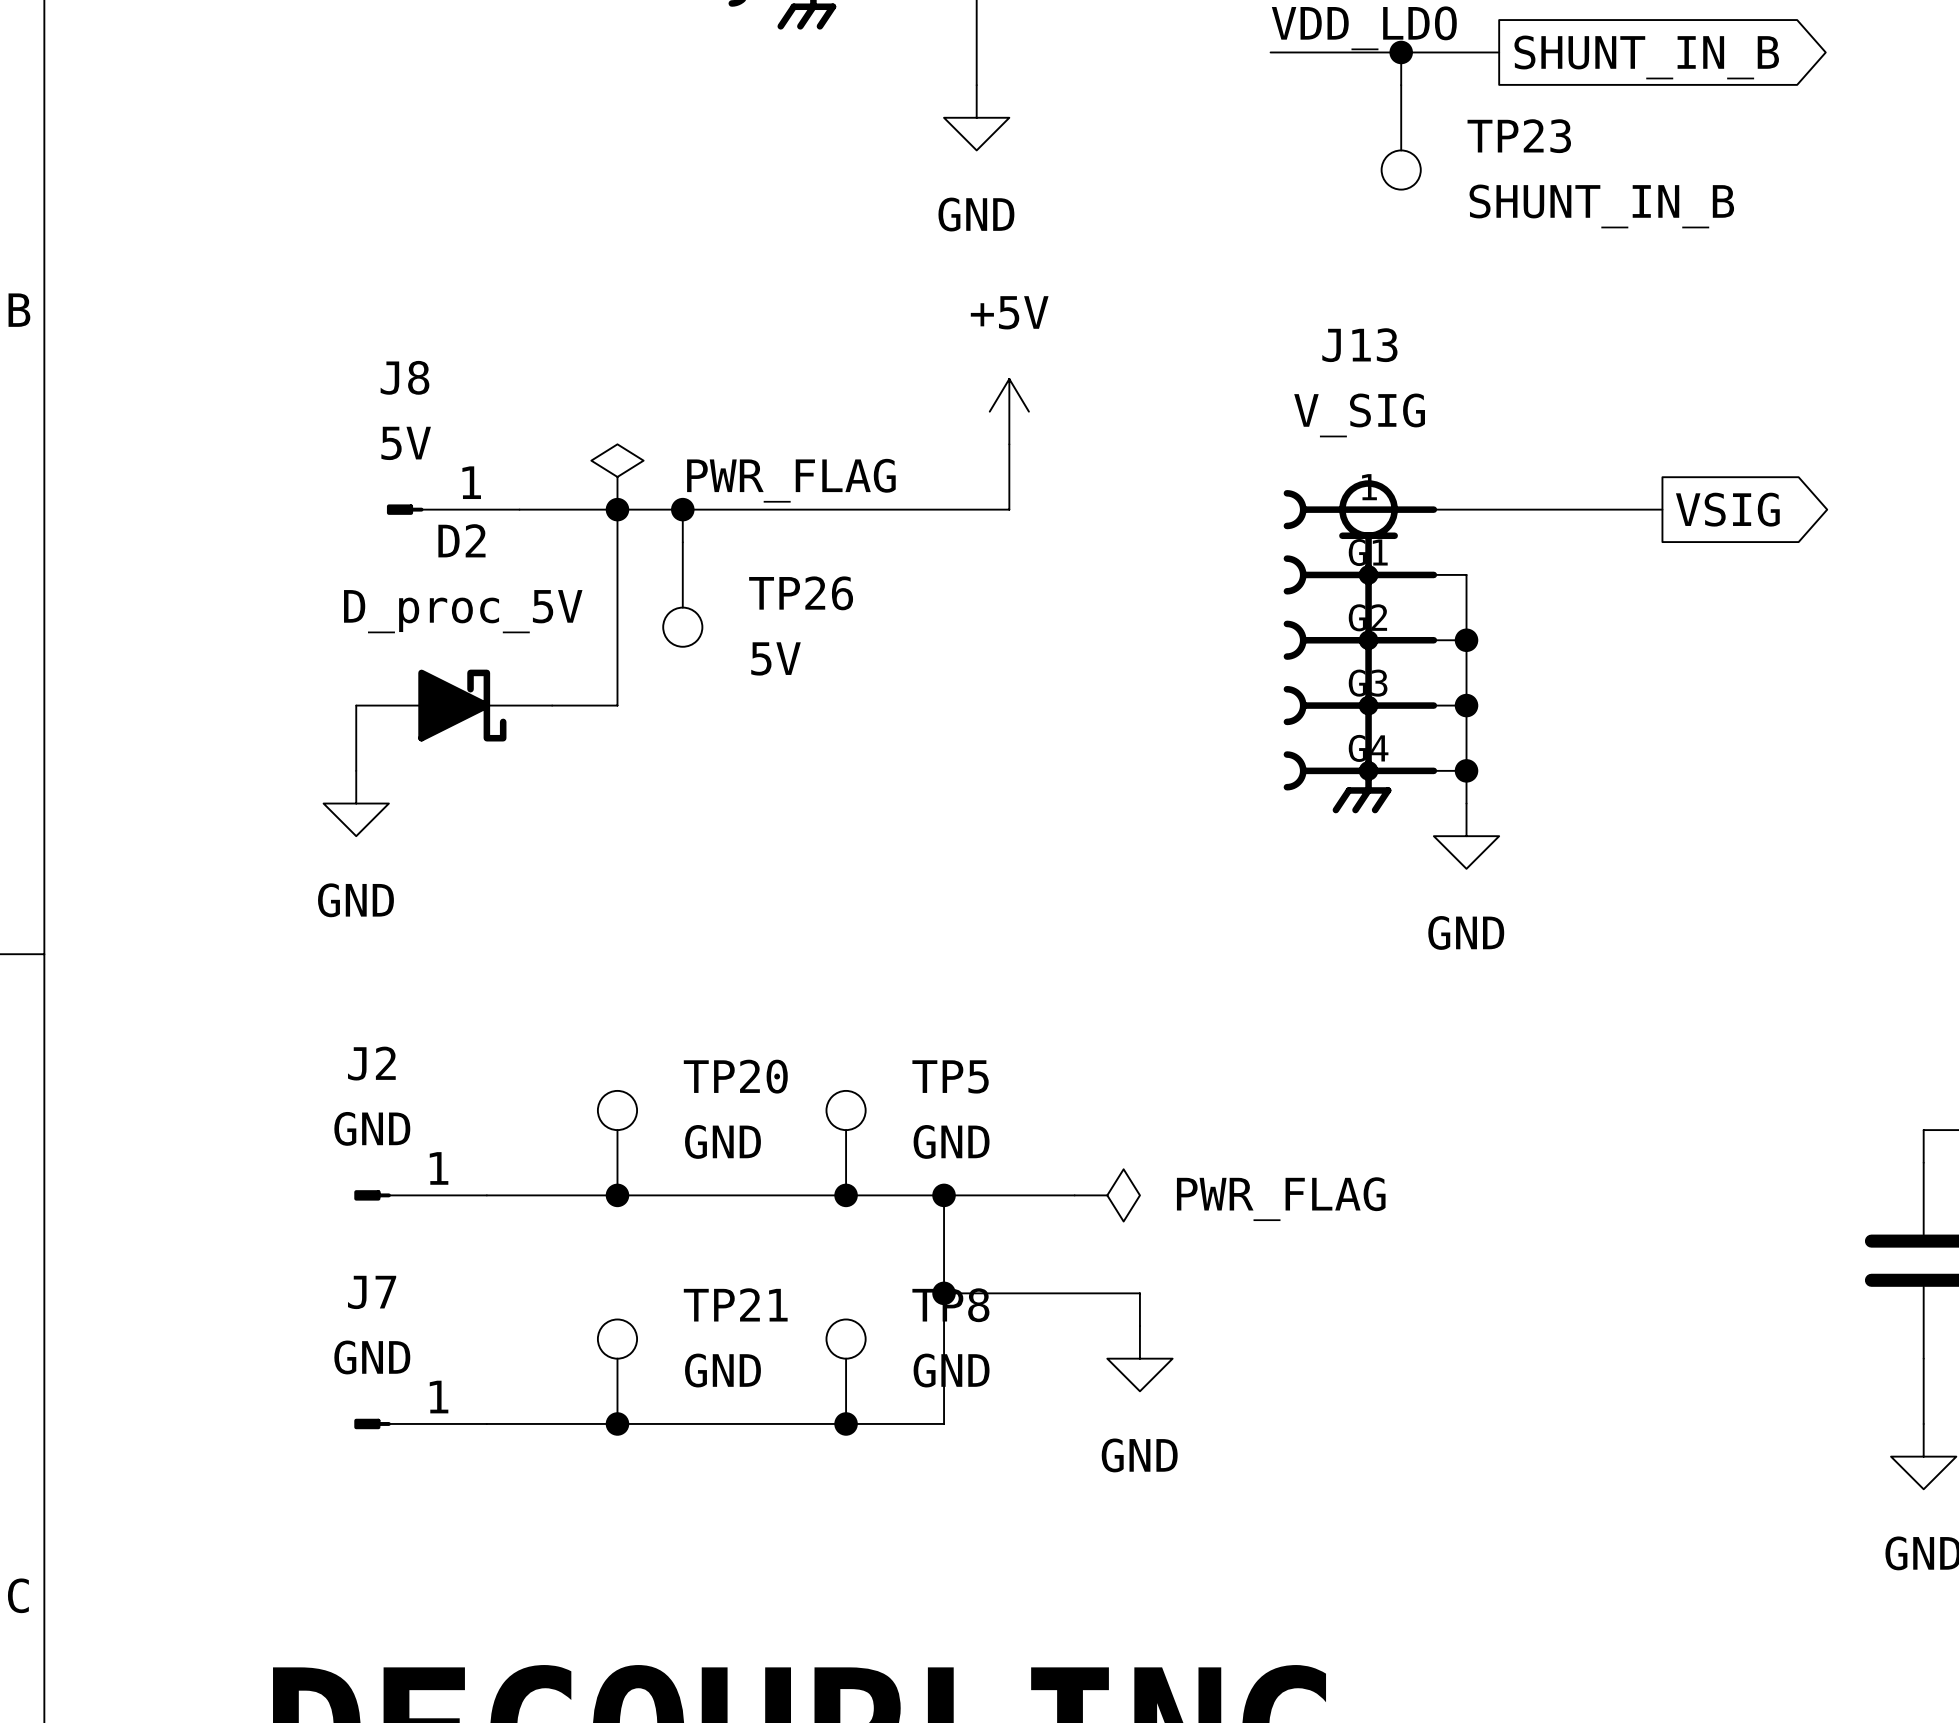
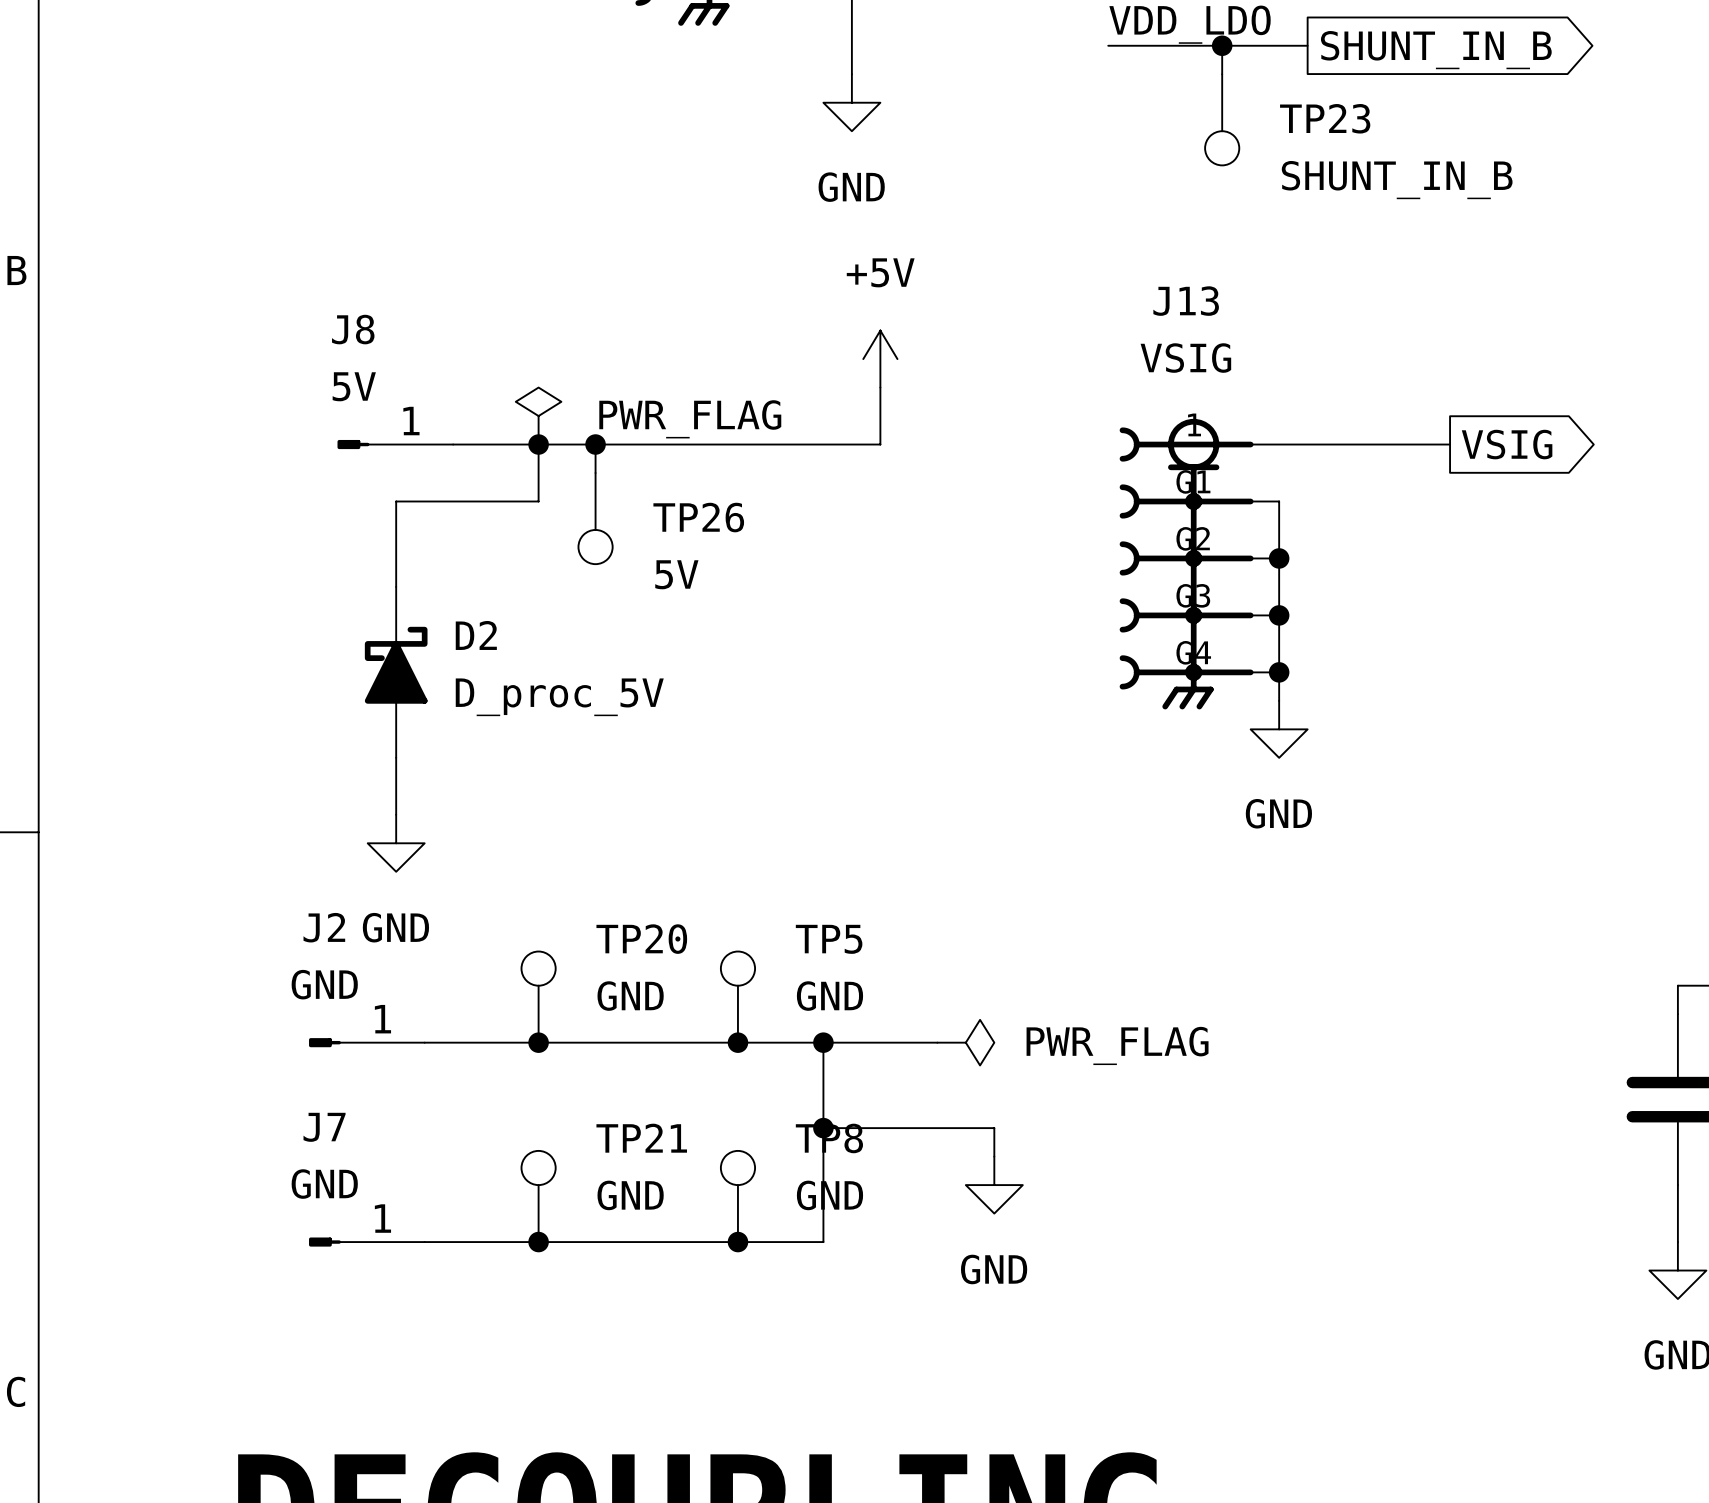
J13 value: V_SIG (1359, 415) -> VSIG (1185, 358)
D2 name position: D2 (461, 540) -> D2 (476, 635)
wire: (617, 574) (617, 705) (552, 705) -> (538, 501) (396, 501) (396, 586)
D2 value position: D_proc_5V (463, 611) -> D_proc_5V (559, 697)
wire: (356, 705) (356, 770) -> (396, 757) (396, 814)
D2 rotation: 0° (462, 705) -> 90° counterclockwise (396, 665)
power symbol position: GND (356, 803) -> GND (396, 843)

